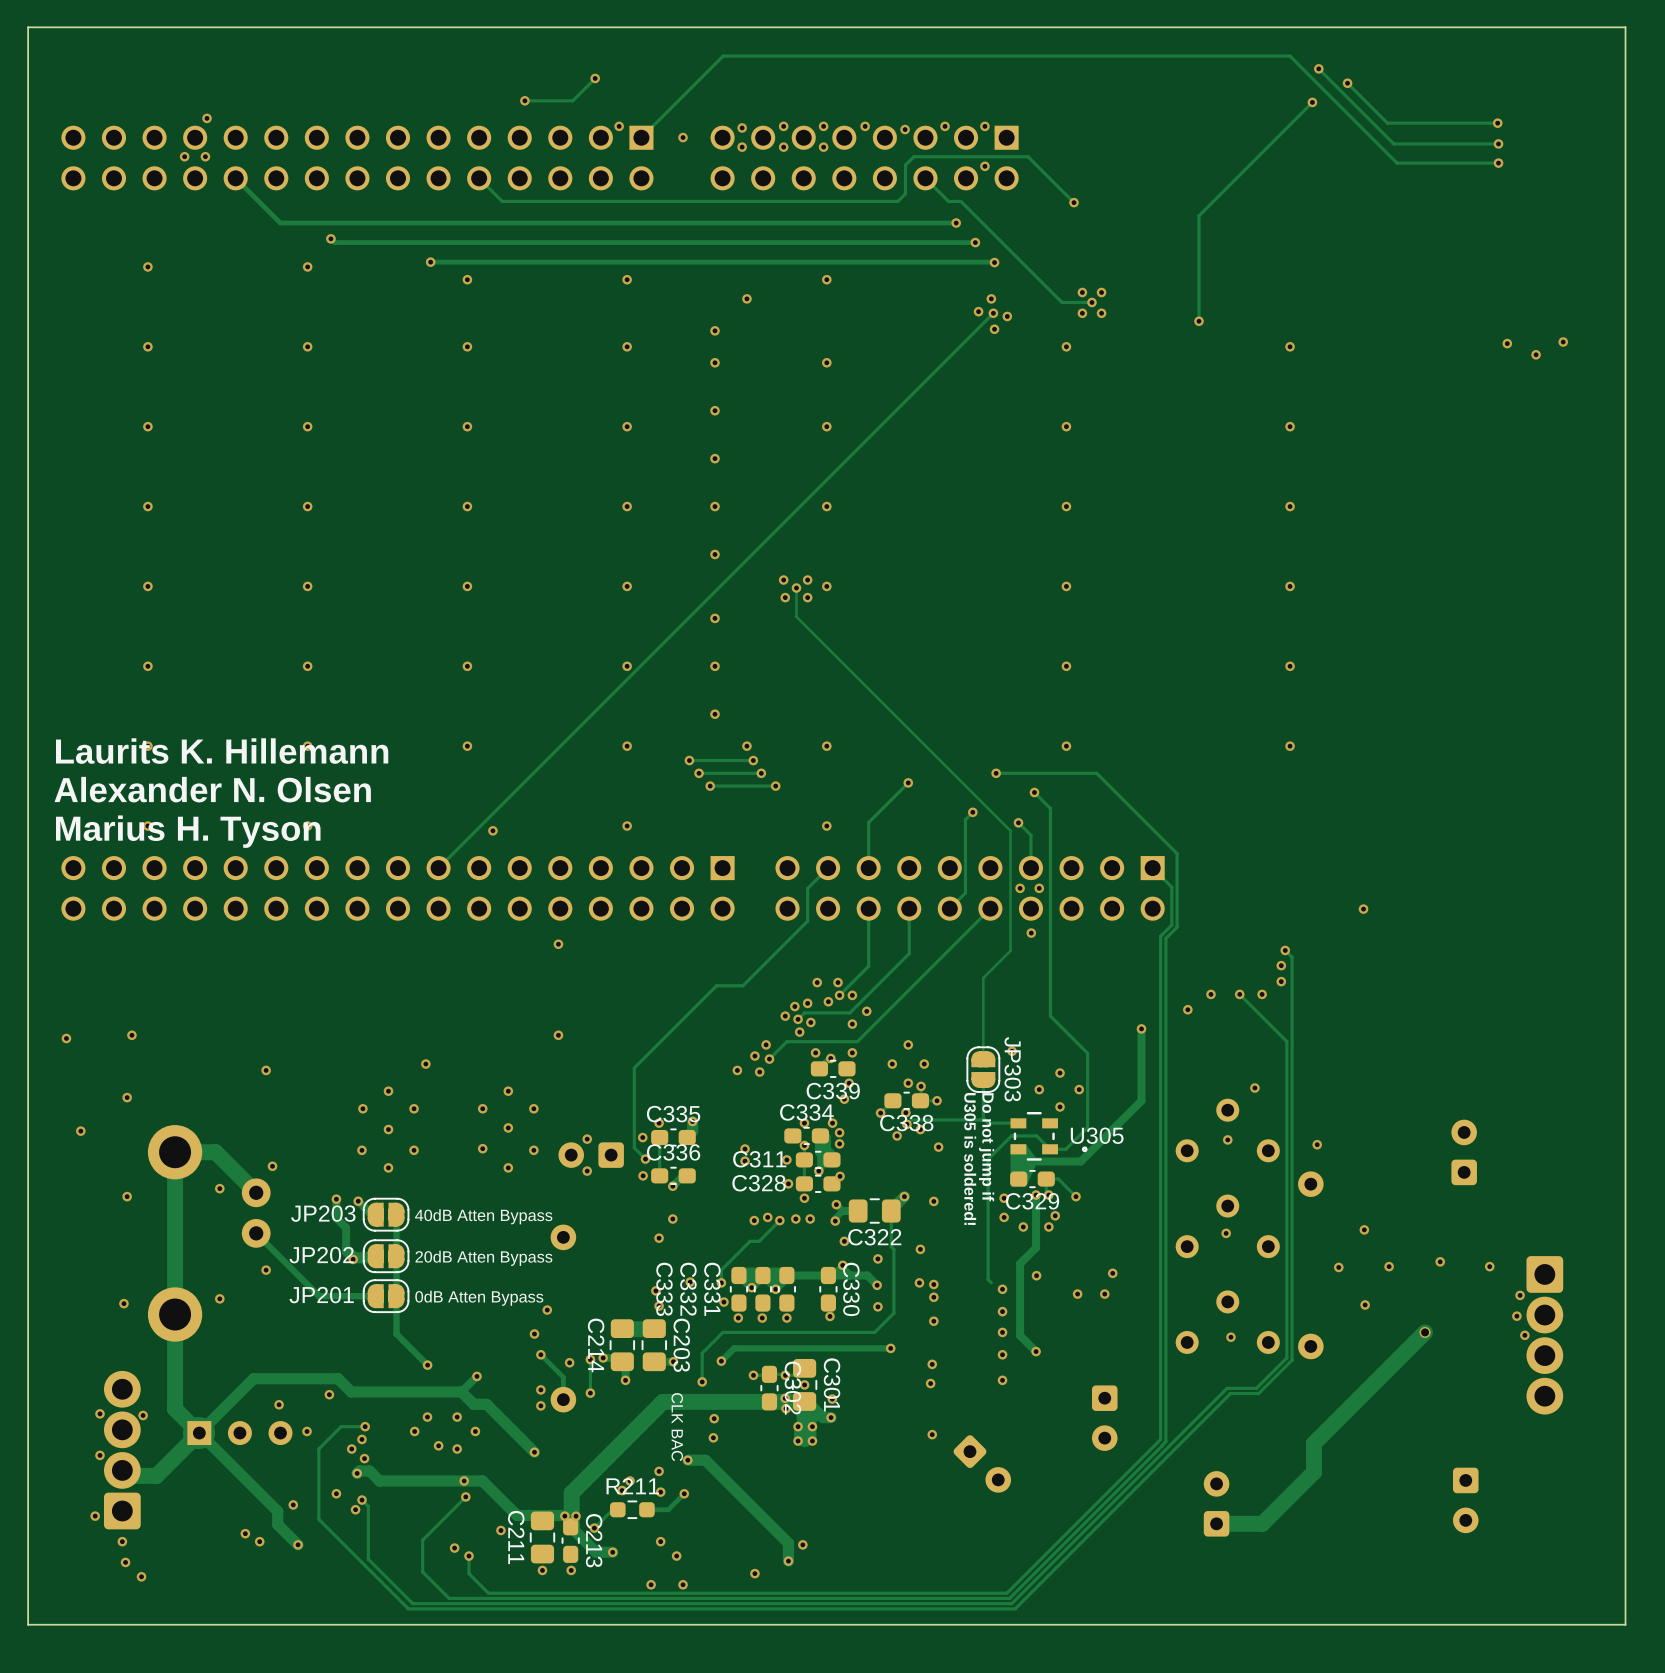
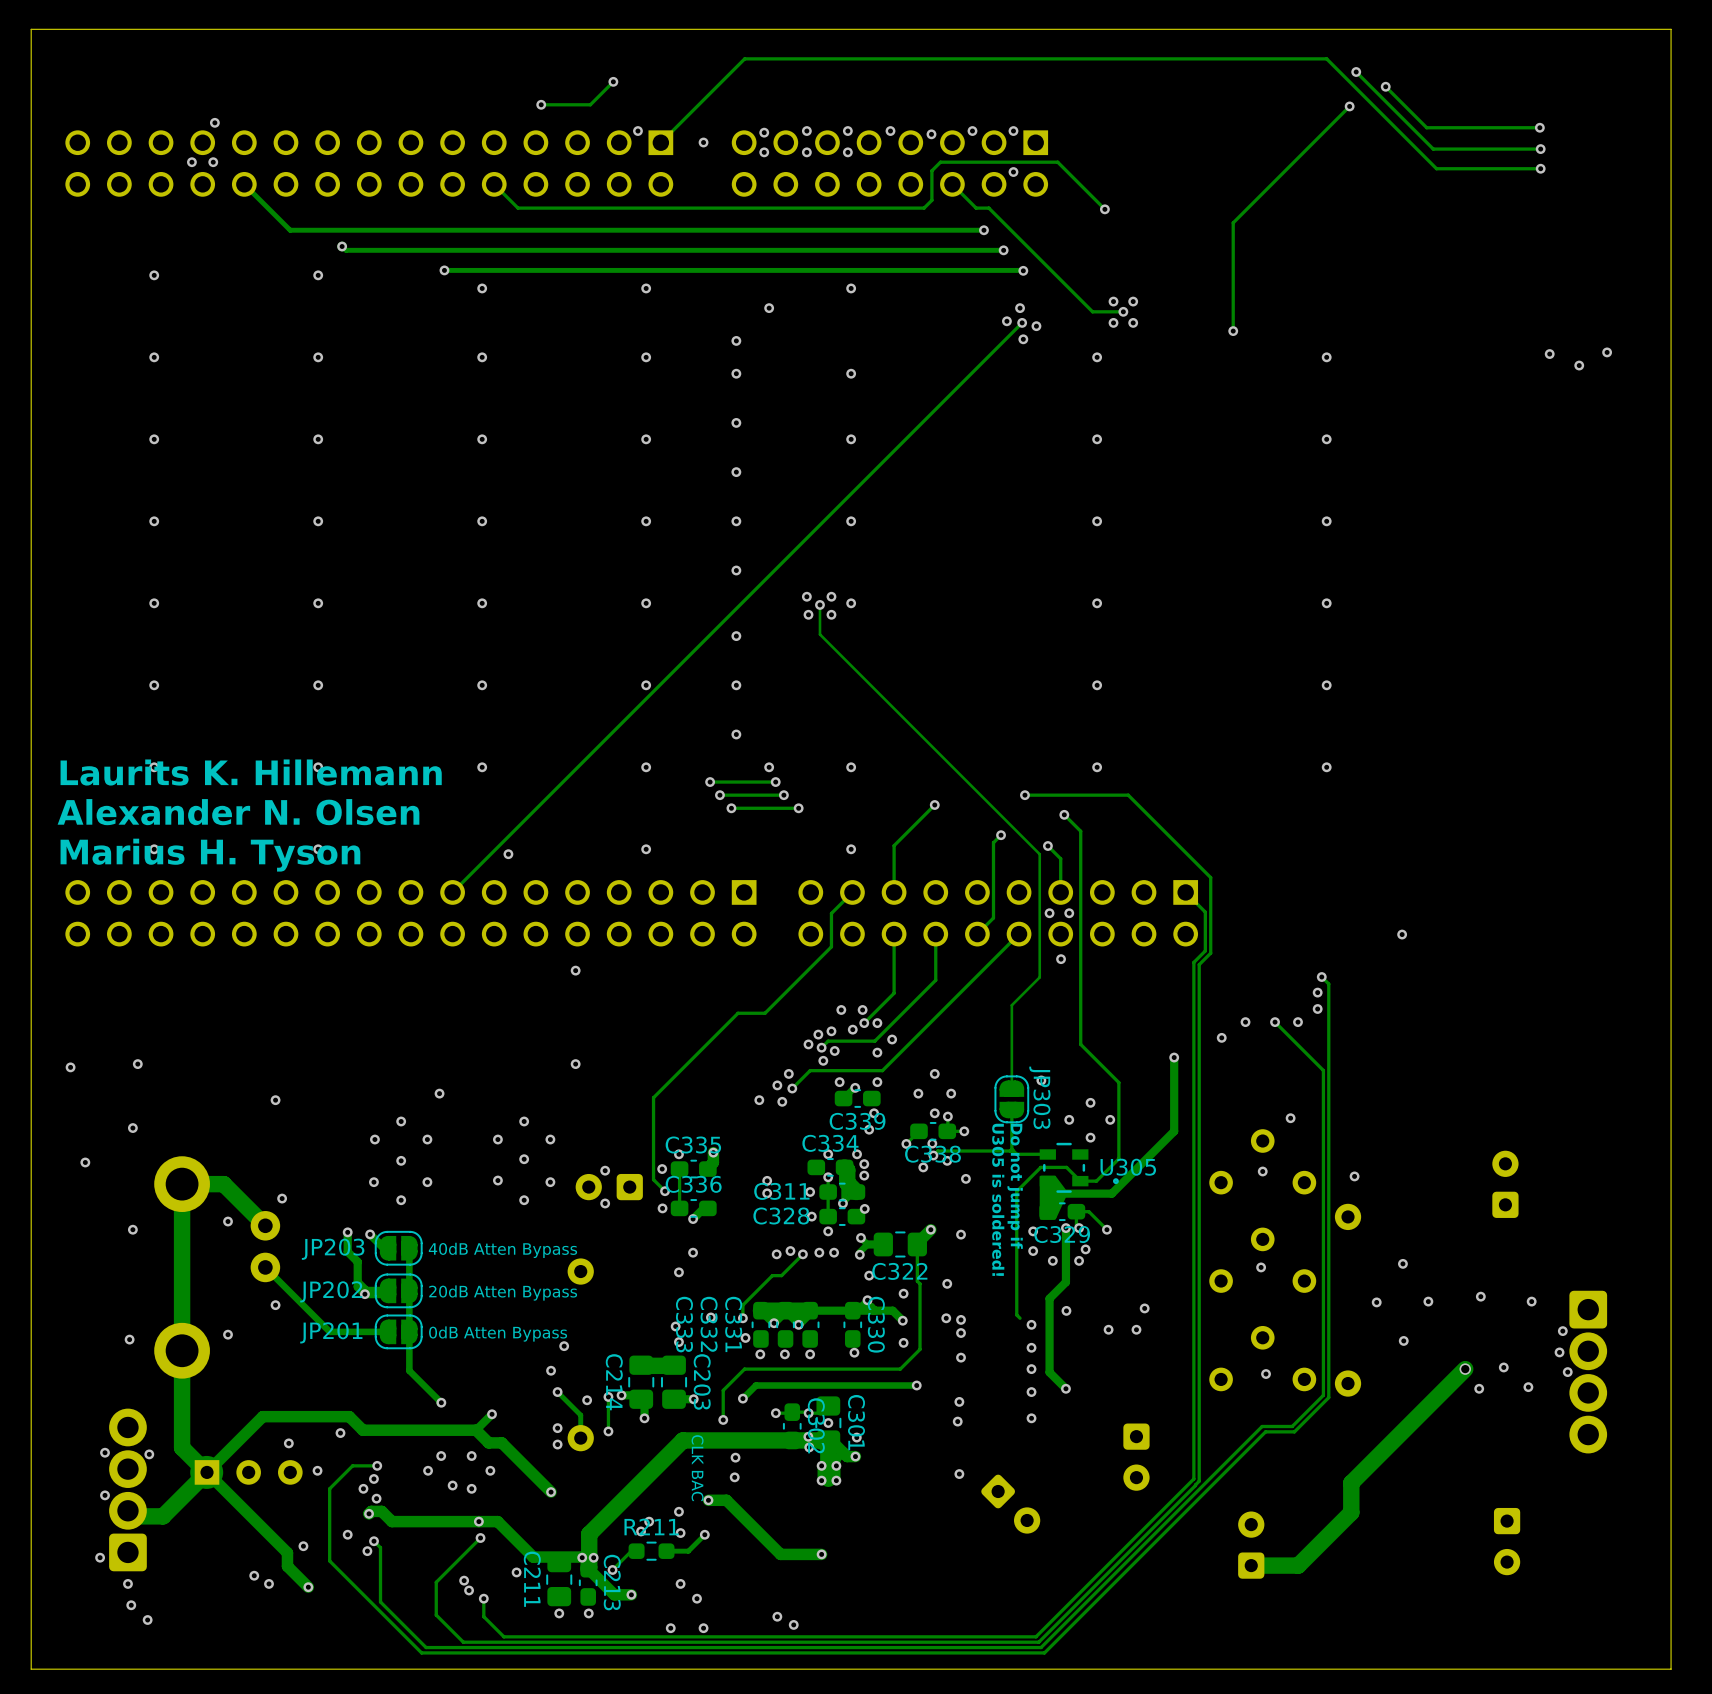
via: none -> (1503, 1367)
via: none -> (1528, 1387)
via: none -> (1479, 1388)
track: (758, 1512) (788, 1543) (788, 1561) -> (780, 1554) (821, 1554)
via: none -> (821, 1554)
via: none -> (464, 1580)
via: (802, 1544) -> none
via: (788, 1561) -> none
via: none -> (793, 1624)

